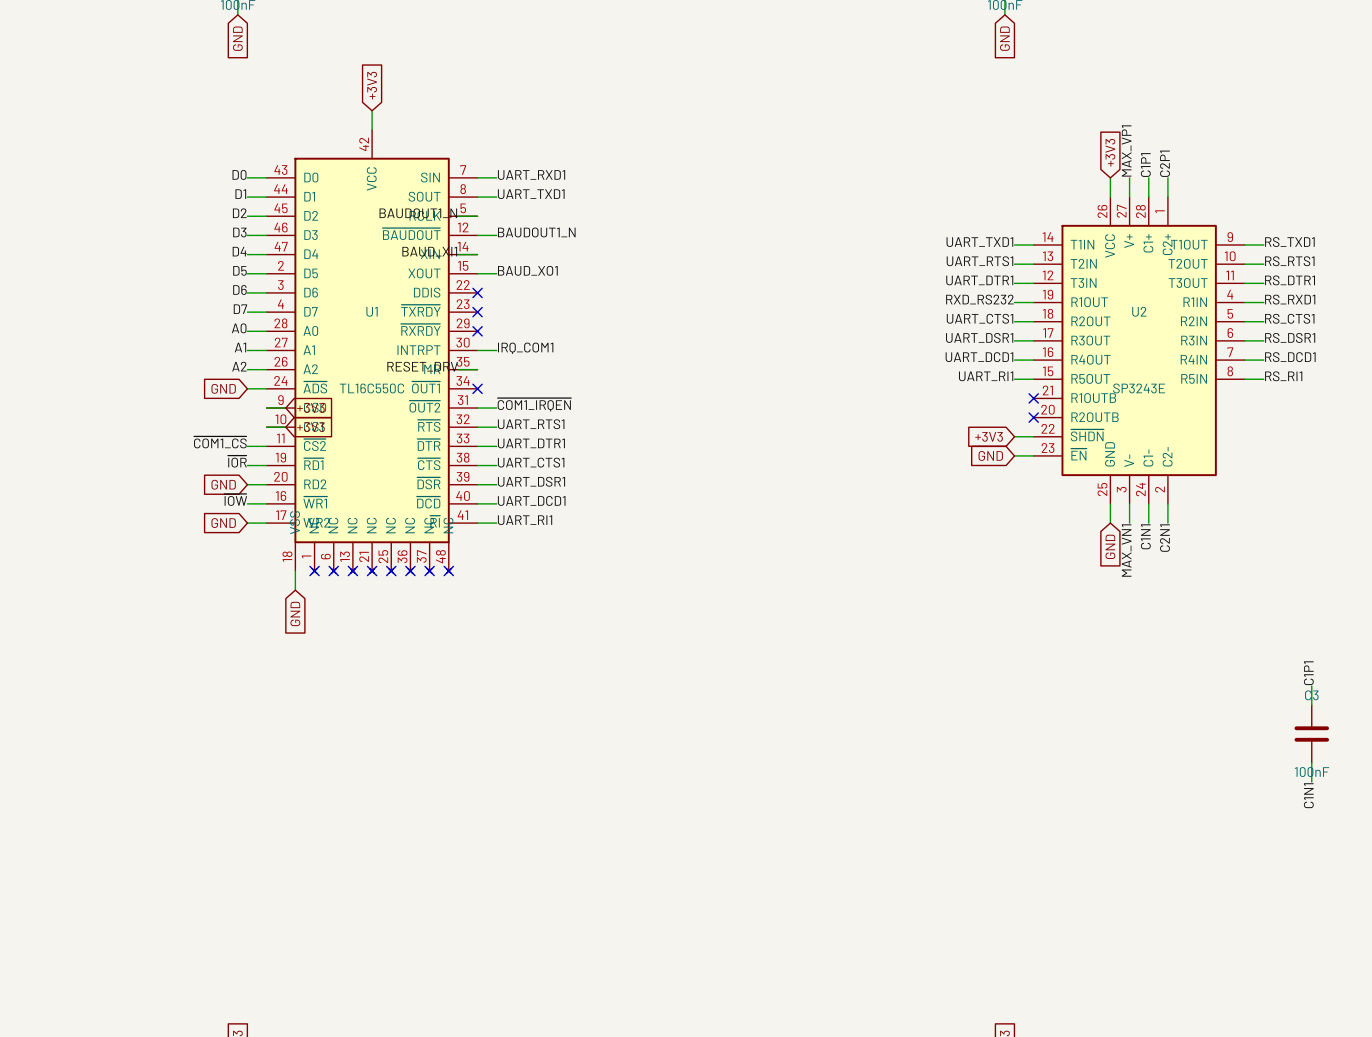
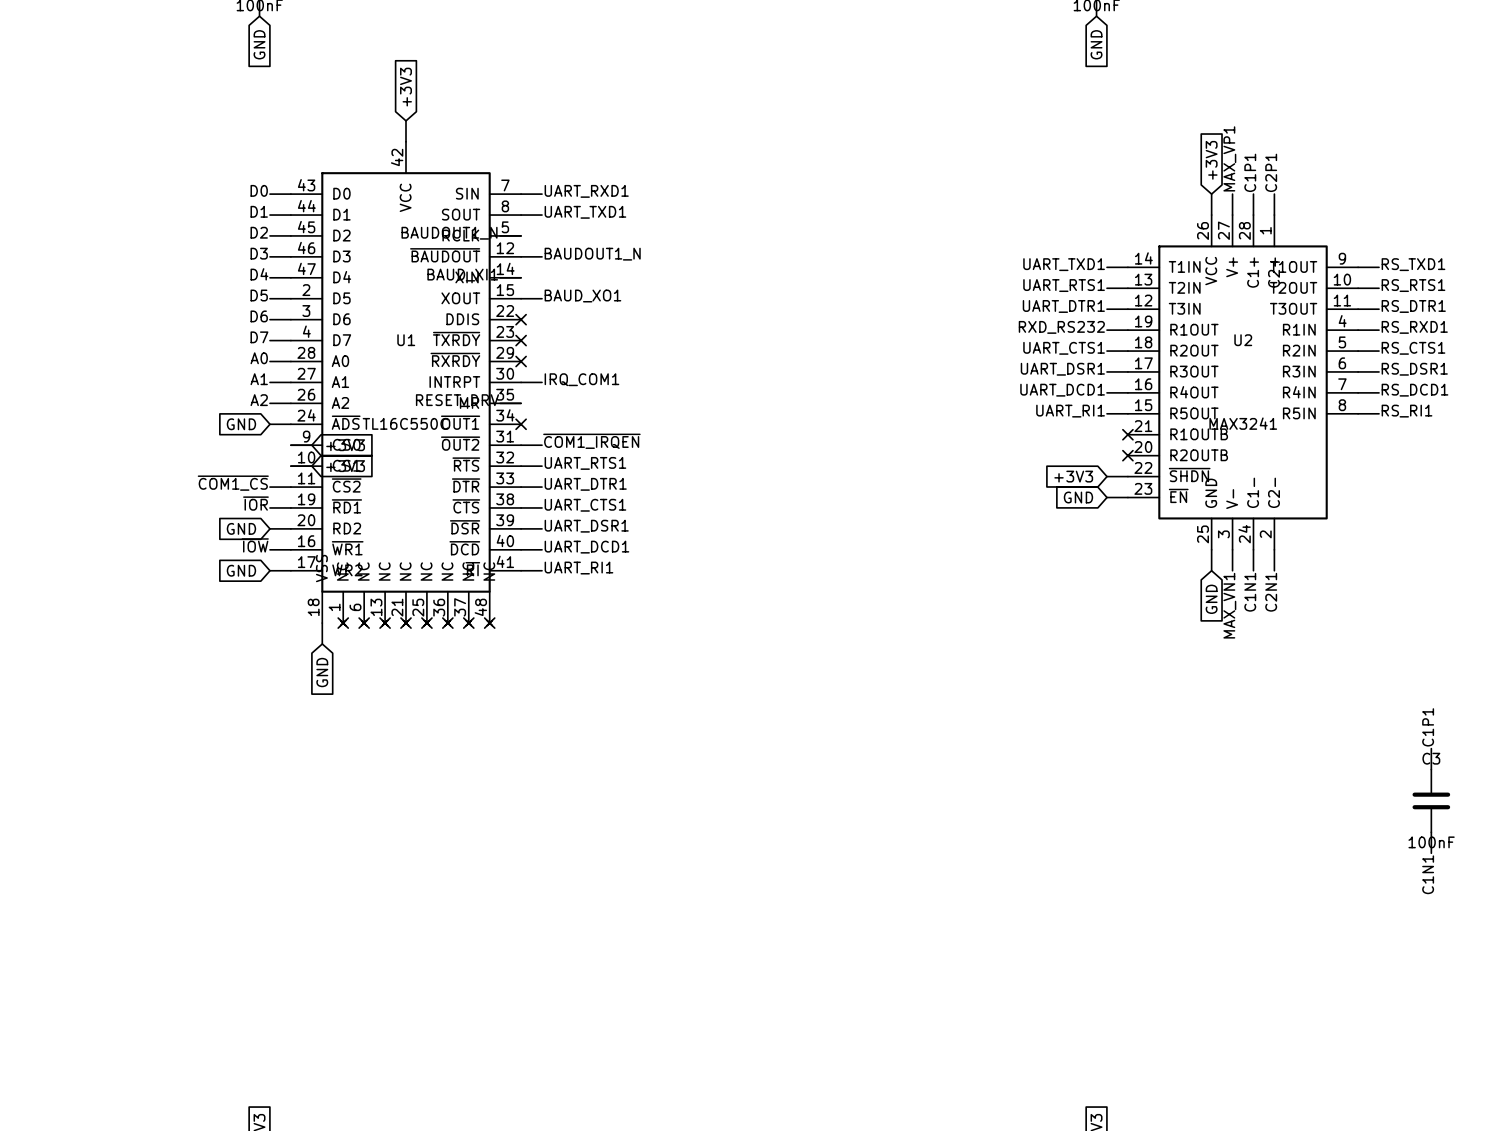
U2 value: SP3243E (1139, 388) -> MAX3241 (1243, 423)

